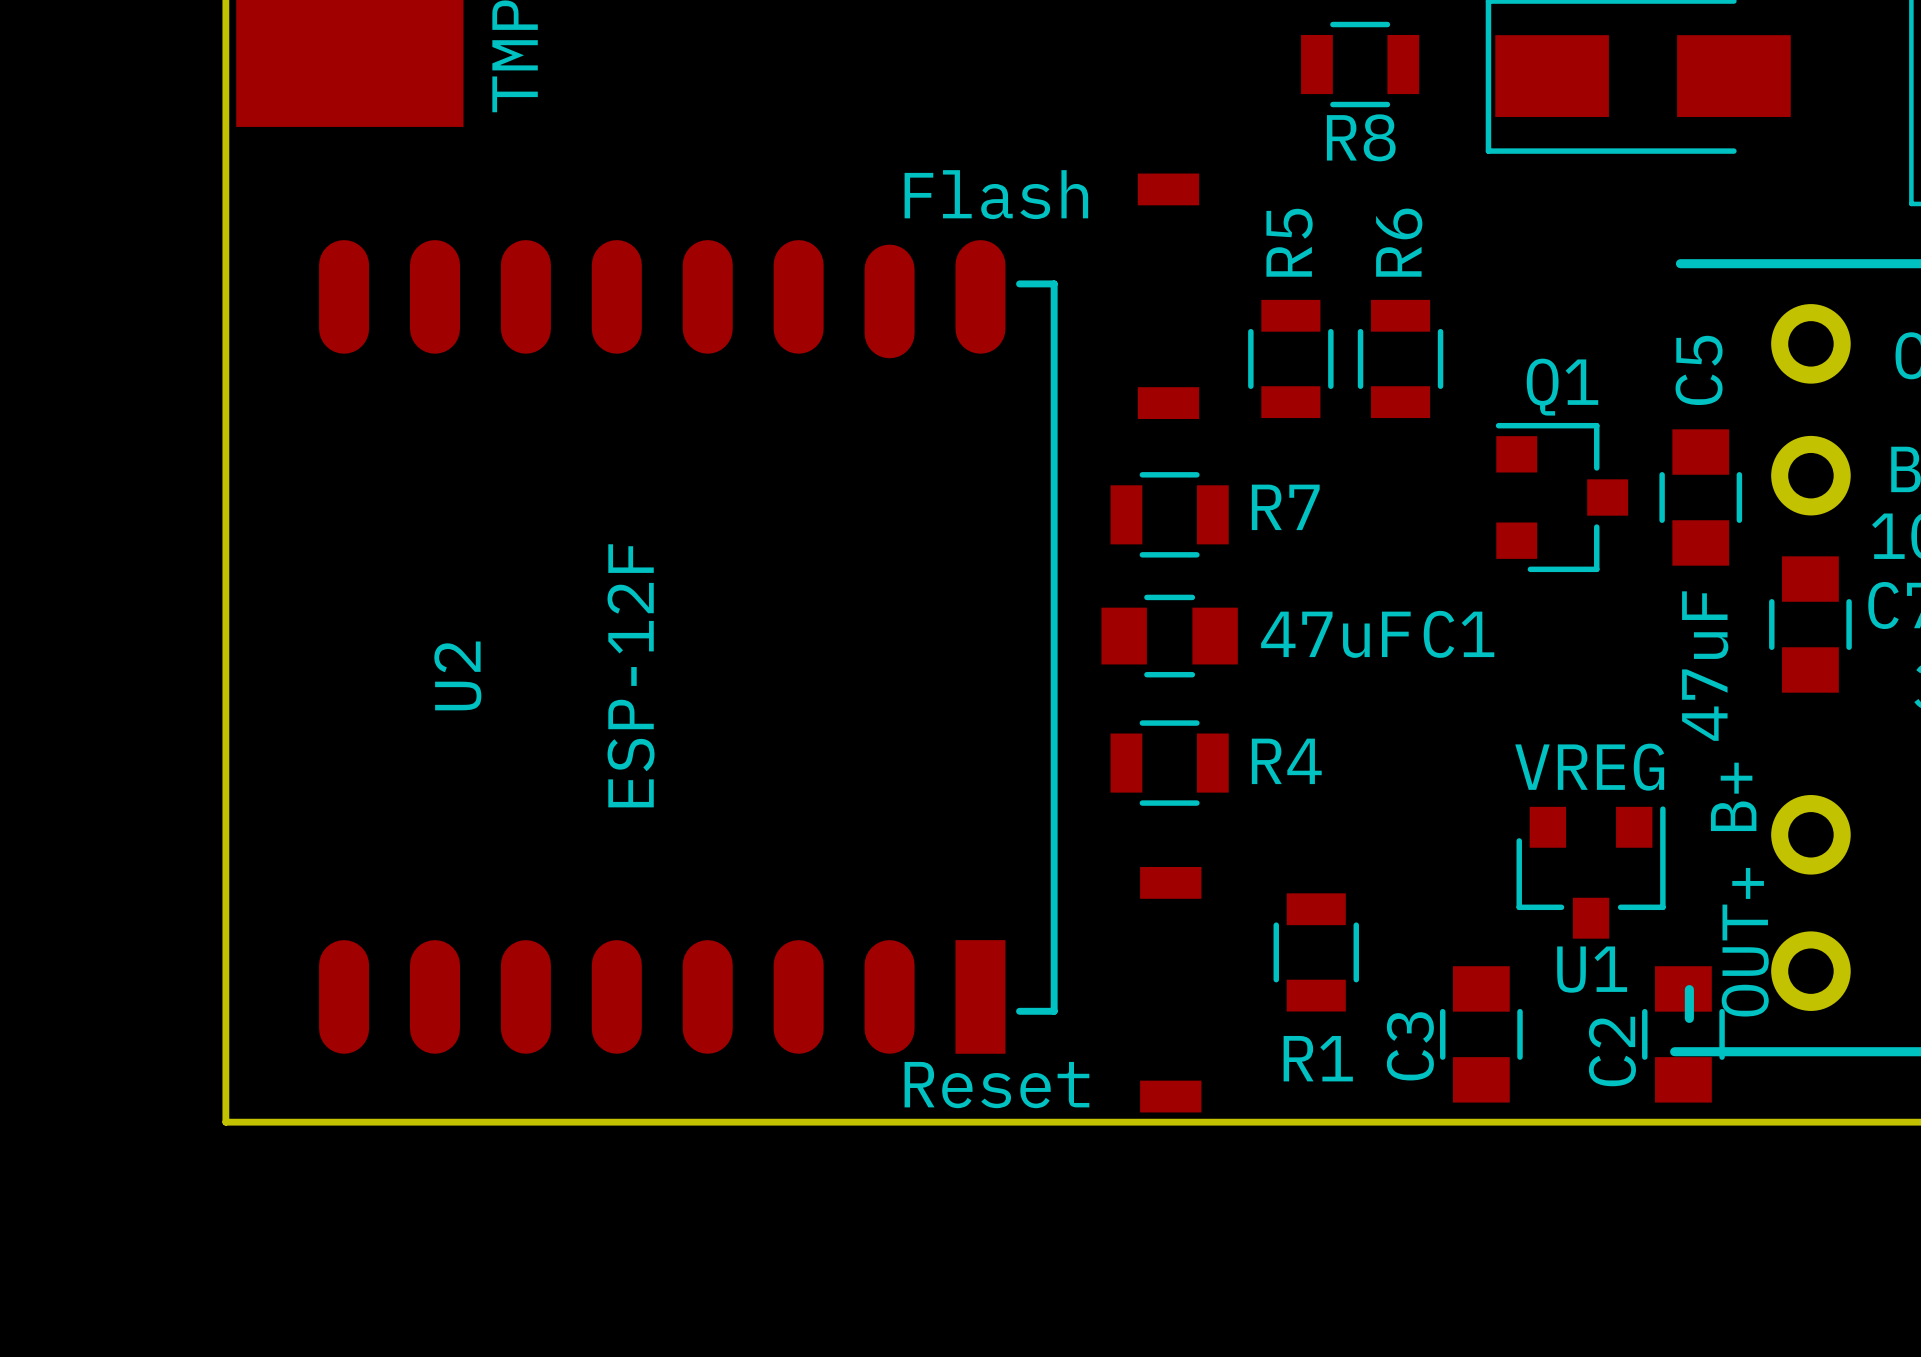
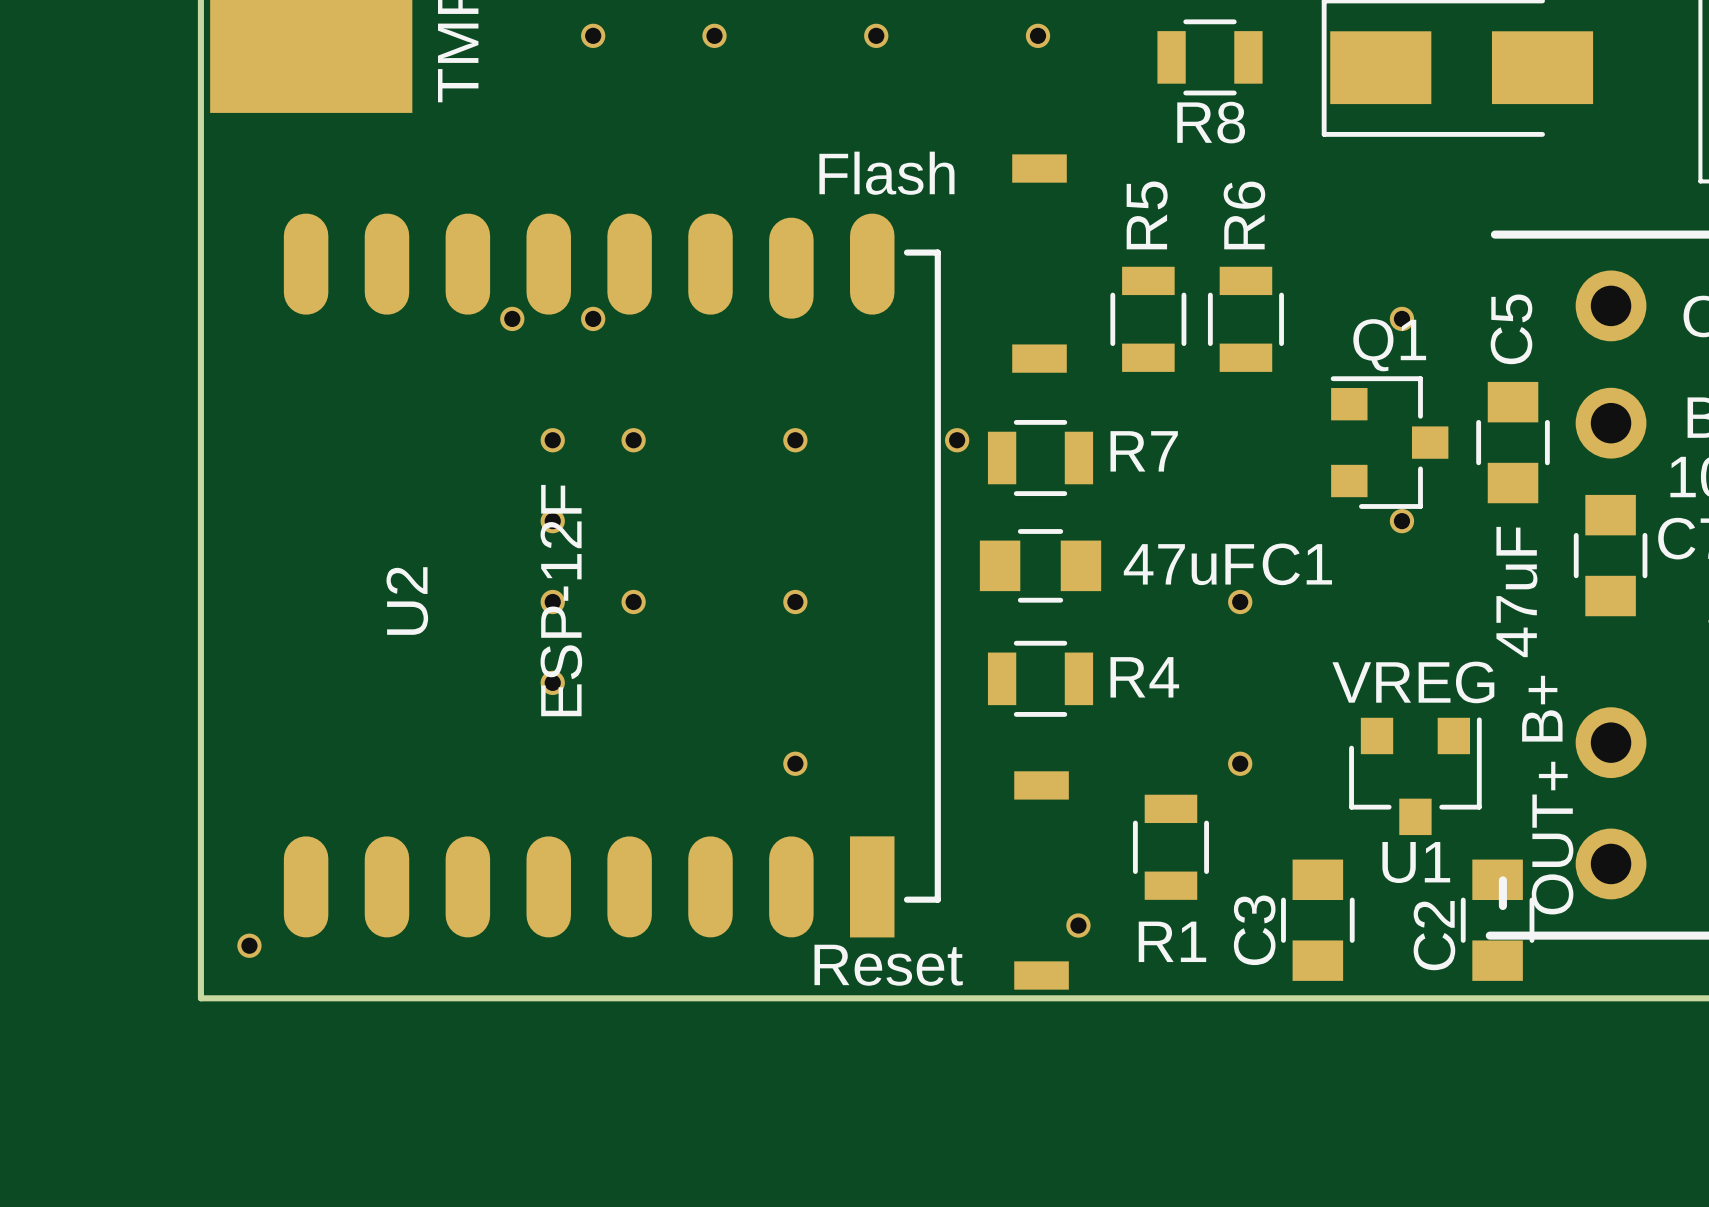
part: none -> (593, 35)
part: none -> (714, 35)
part: none -> (876, 35)
part: none -> (1038, 35)
part: none -> (512, 318)
part: none -> (593, 318)
part: none -> (1401, 318)
part: none -> (552, 440)
part: none -> (633, 440)
part: none -> (795, 440)
part: none -> (957, 440)
part: none -> (552, 521)
part: none -> (1401, 521)
part: none -> (552, 602)
part: none -> (633, 602)
part: none -> (795, 602)
part: none -> (1240, 602)
part: none -> (552, 682)
part: none -> (795, 763)
part: none -> (1240, 763)
part: none -> (1078, 925)
part: none -> (249, 945)

